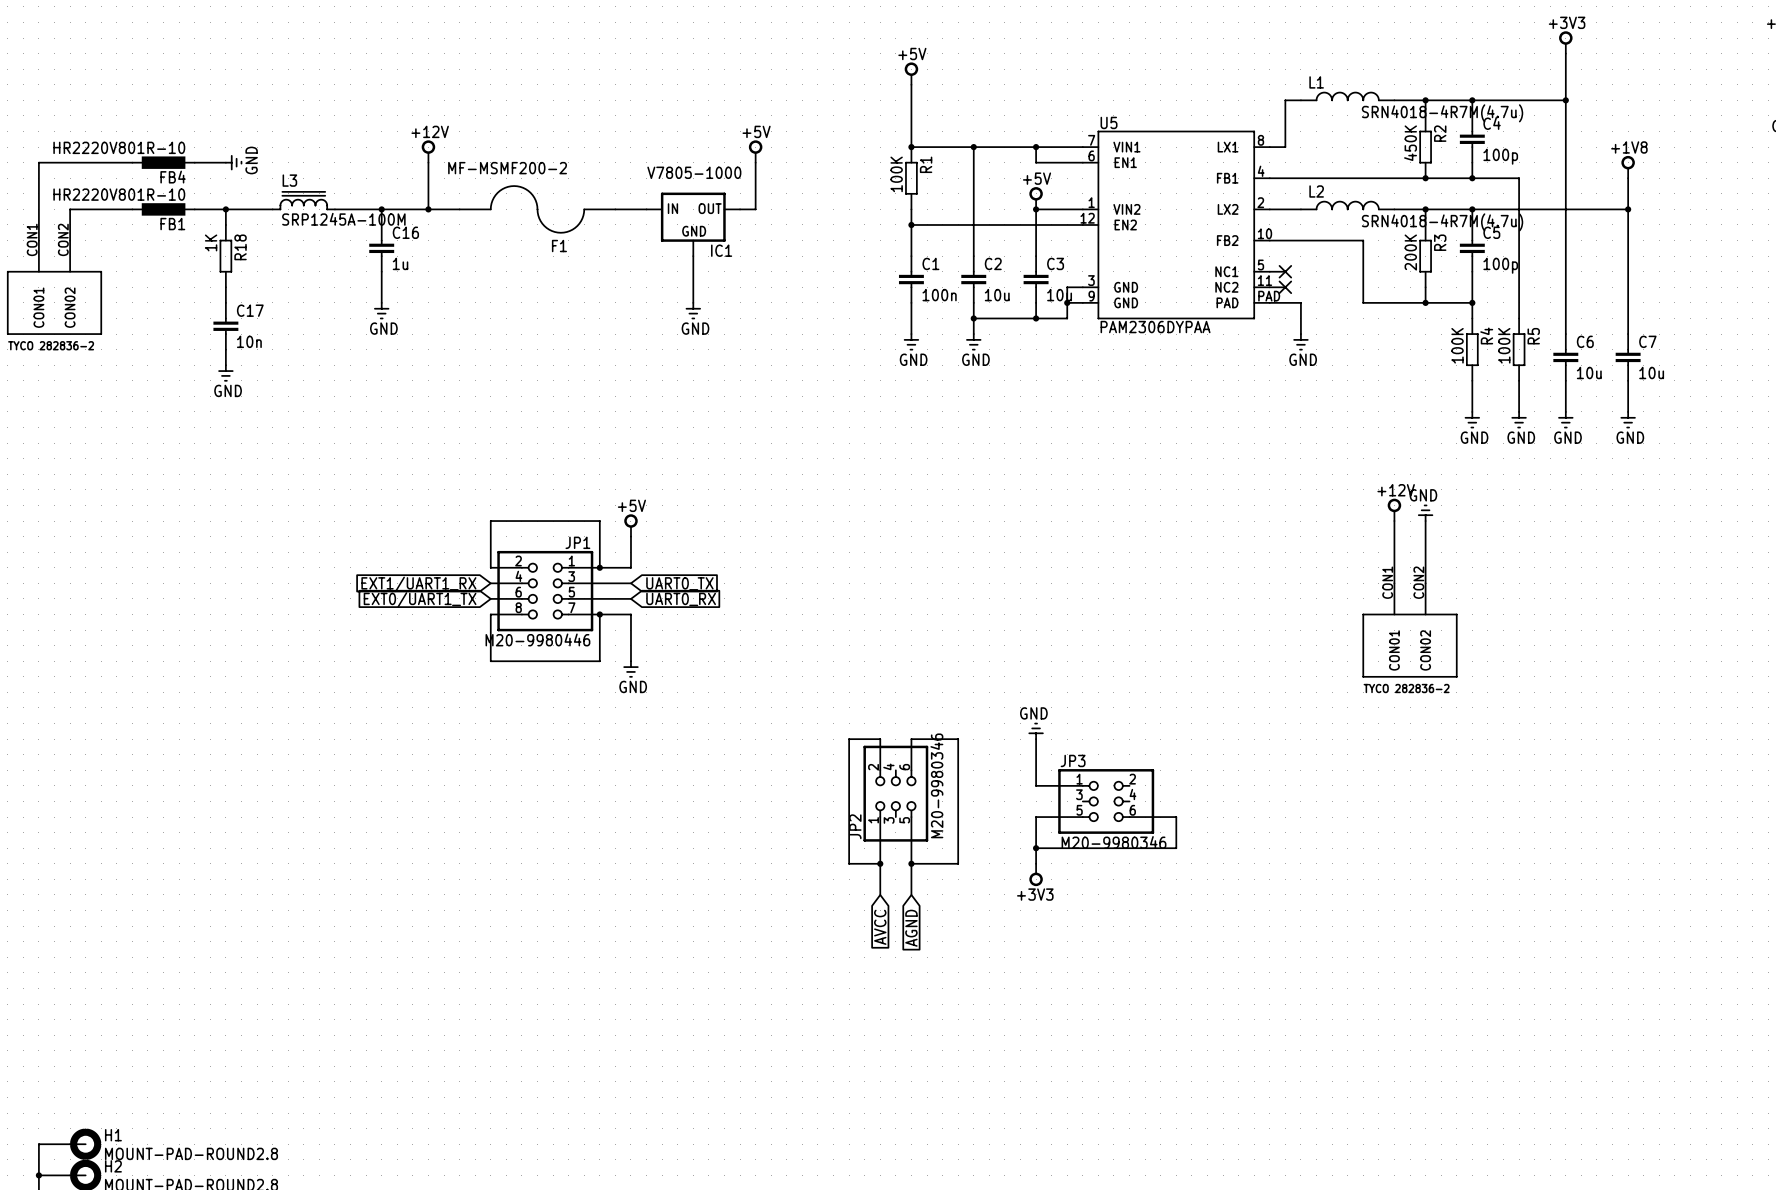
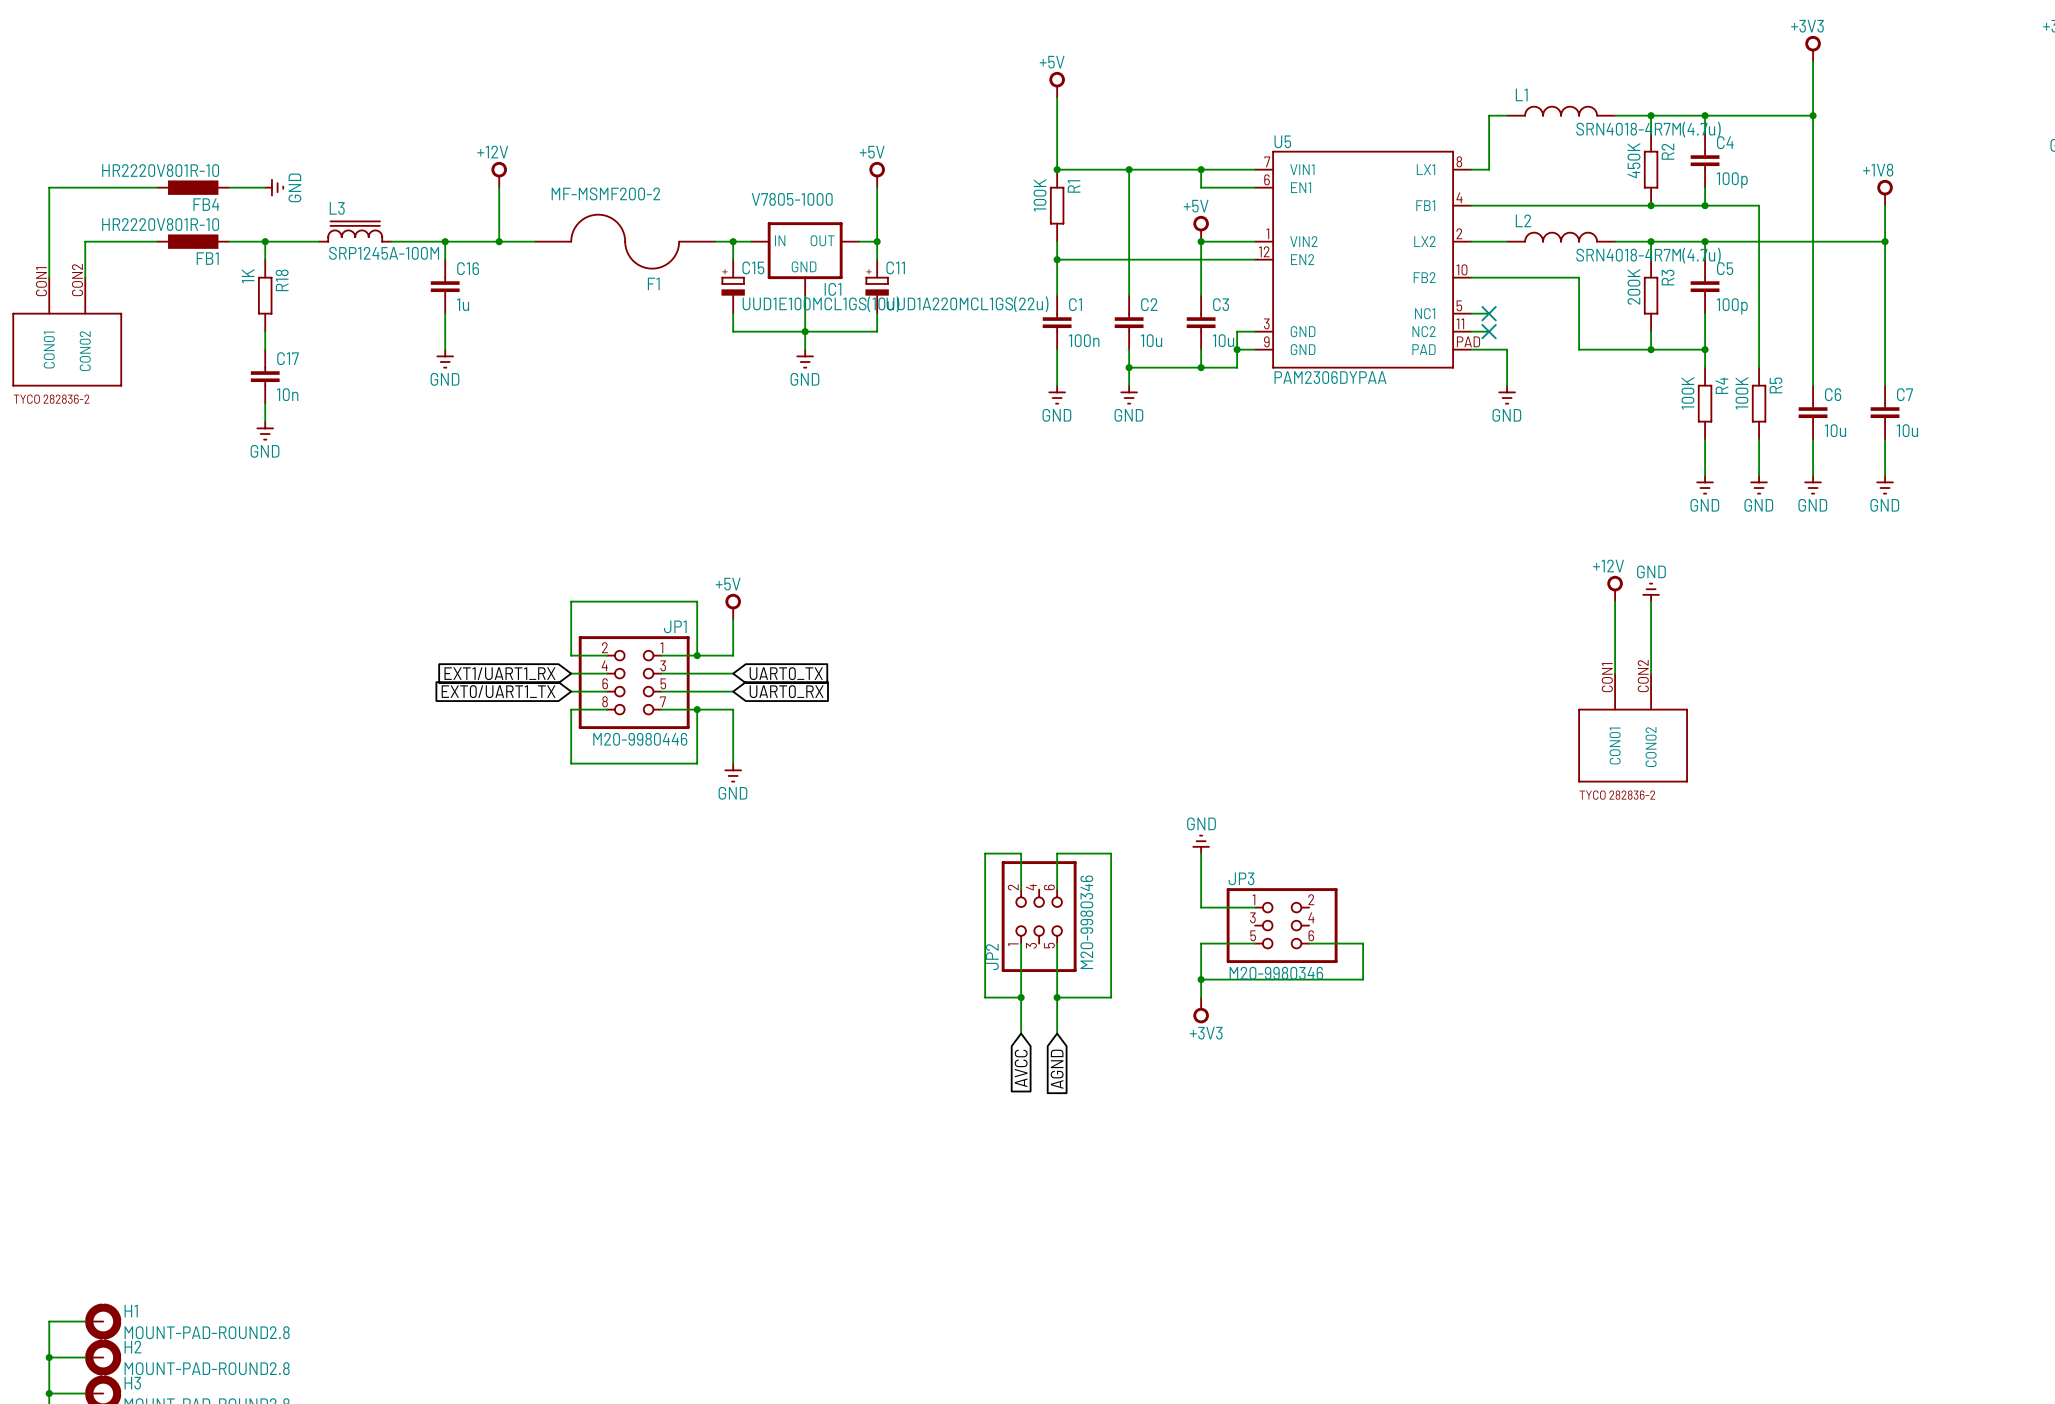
wire: none -> (733, 241) (733, 259)
junction: none -> (733, 241)
wire: none -> (877, 241) (877, 259)
junction: none -> (877, 241)
C15: none -> UUD1E100MCL1GS(10u) (733, 286)
C11: none -> UUD1A220MCL1GS(22u) (877, 286)
wire: none -> (733, 313) (733, 331) (877, 331) (877, 313)
junction: none -> (805, 331)

